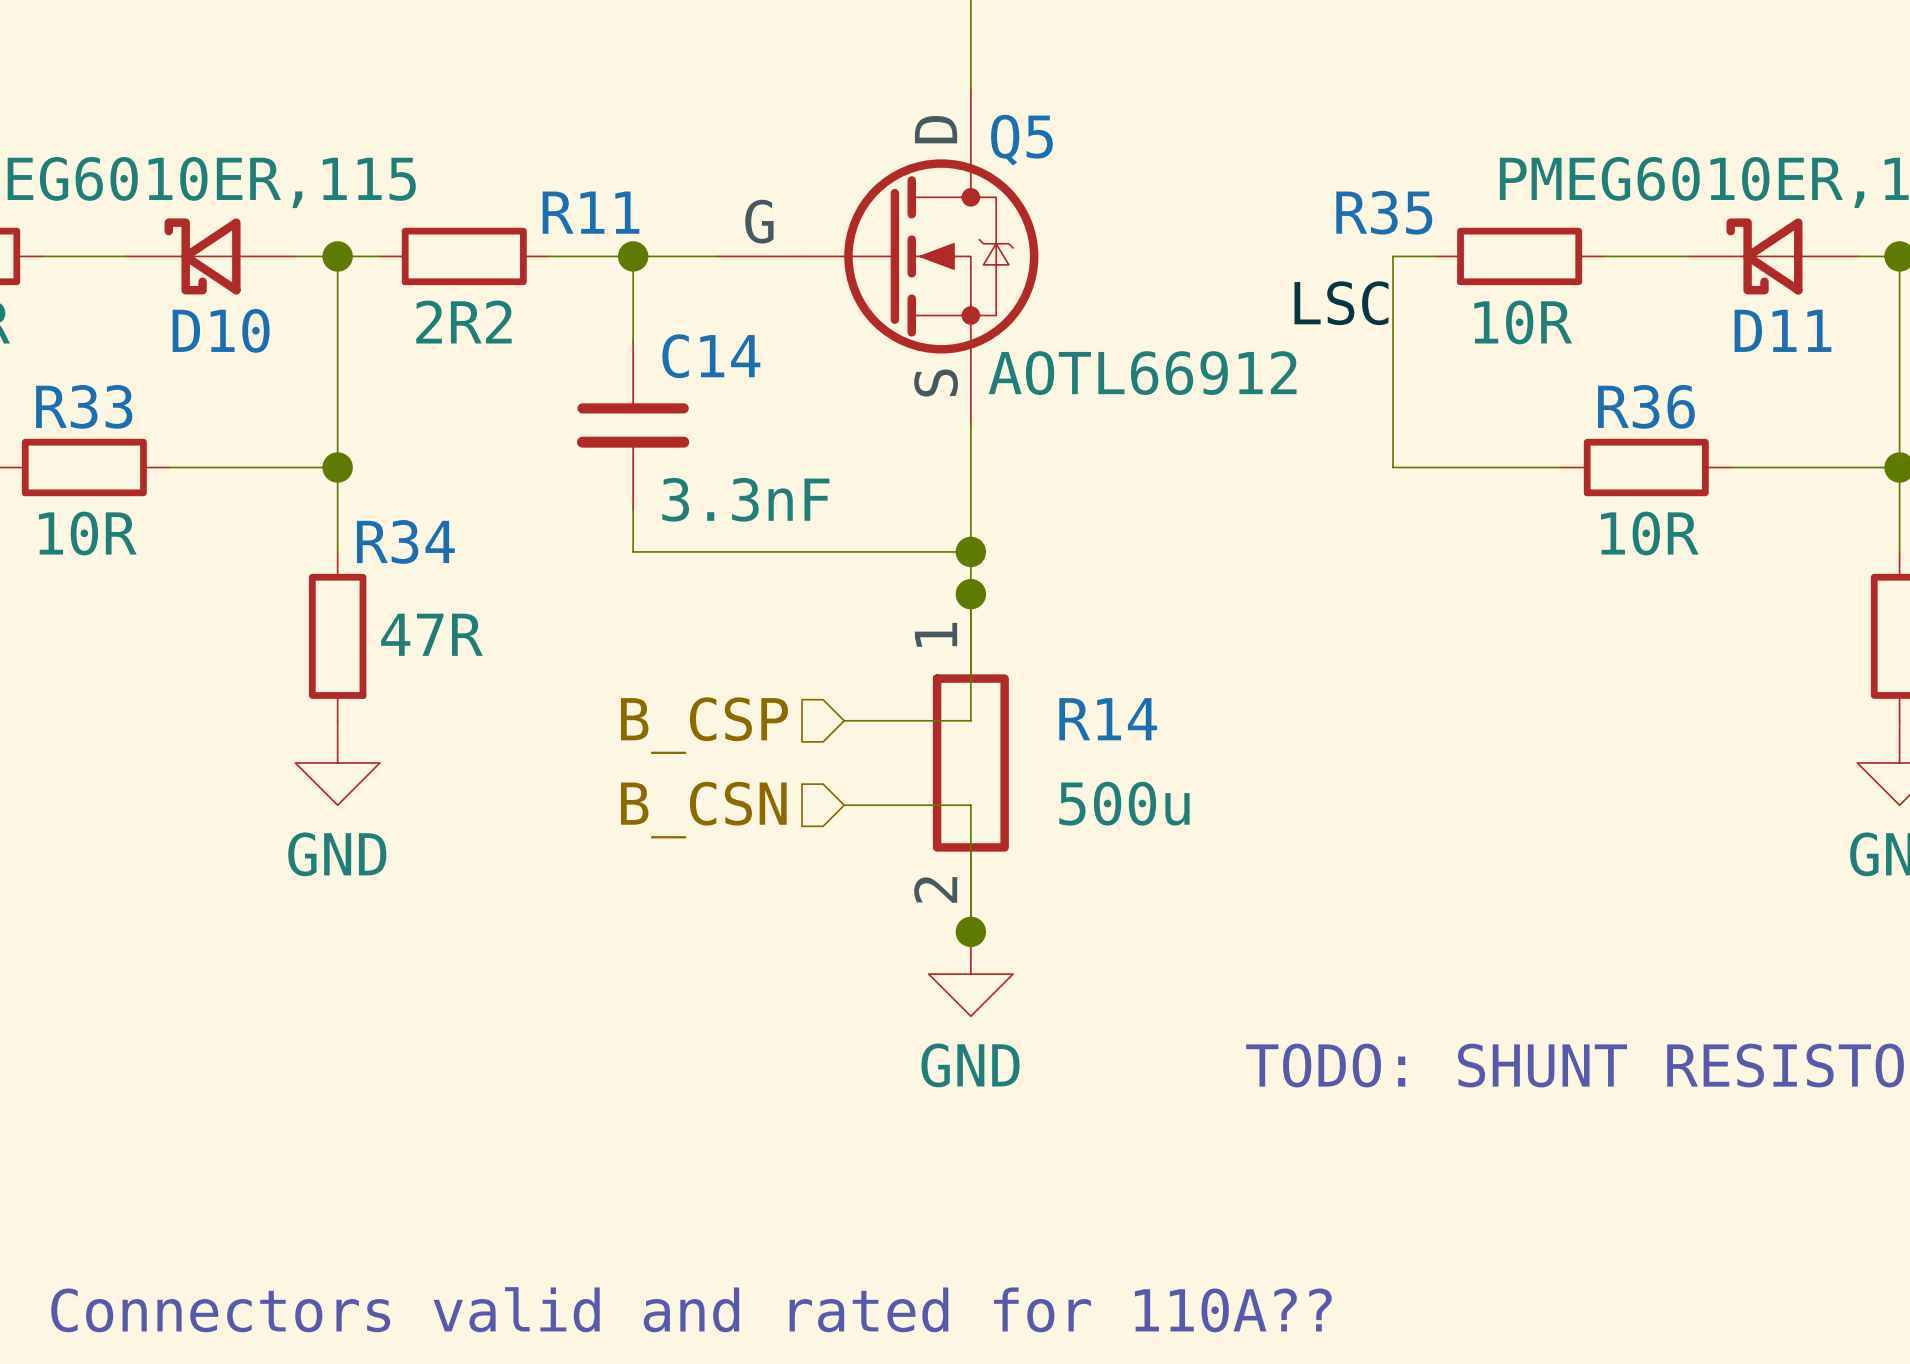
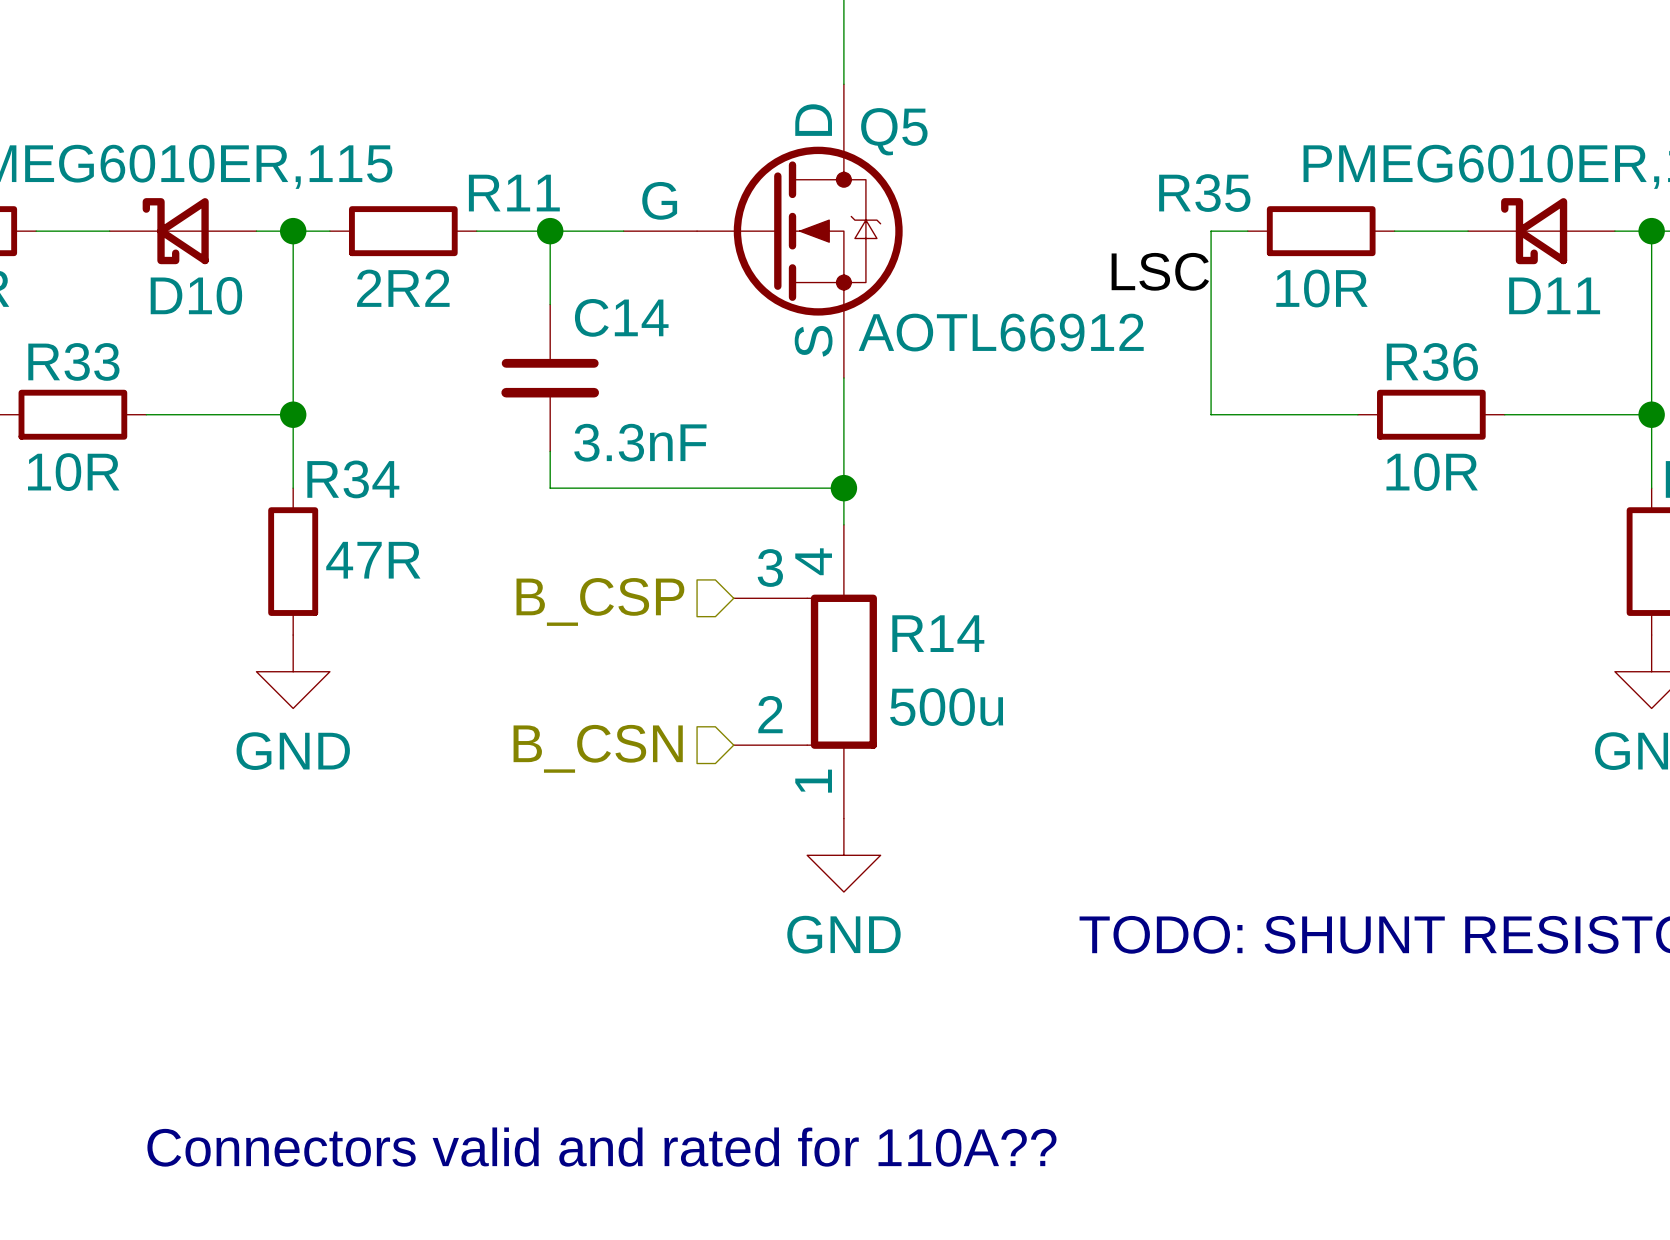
R14 symbol: [932, 594, 1009, 932] -> [733, 524, 877, 819]
wire: (970, 594) (970, 720) (844, 720) -> none
junction: (970, 594) -> none
hierarchical label position: B_CSP (704, 725) -> B_CSP (600, 601)
wire: (844, 805) (970, 805) (970, 931) -> none
hierarchical label position: B_CSN (703, 810) -> B_CSN (598, 748)
junction: (970, 931) -> none

